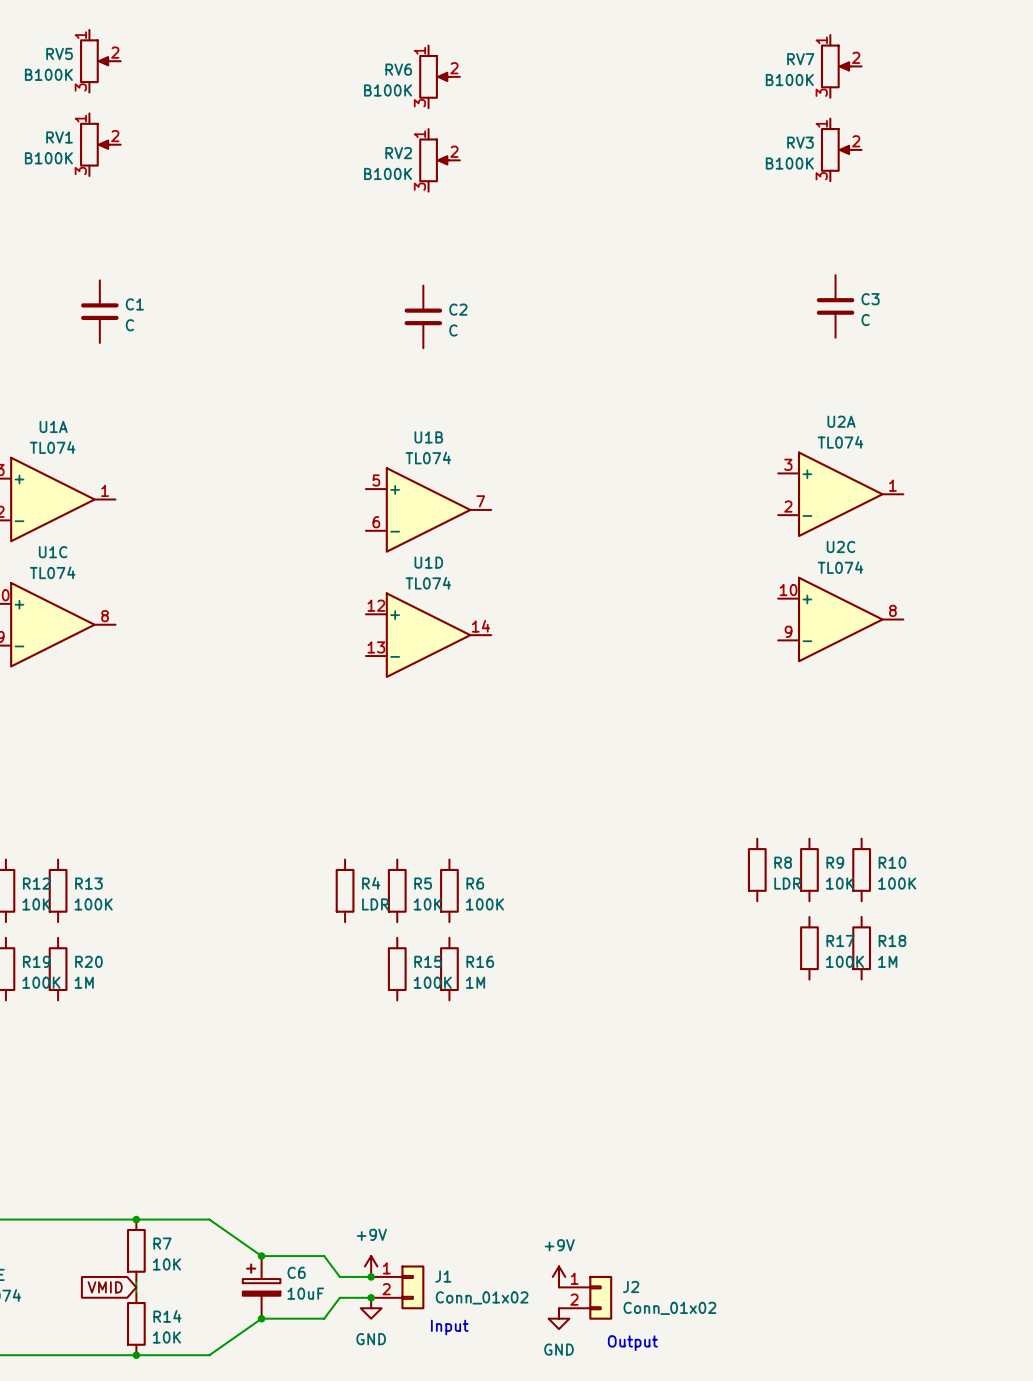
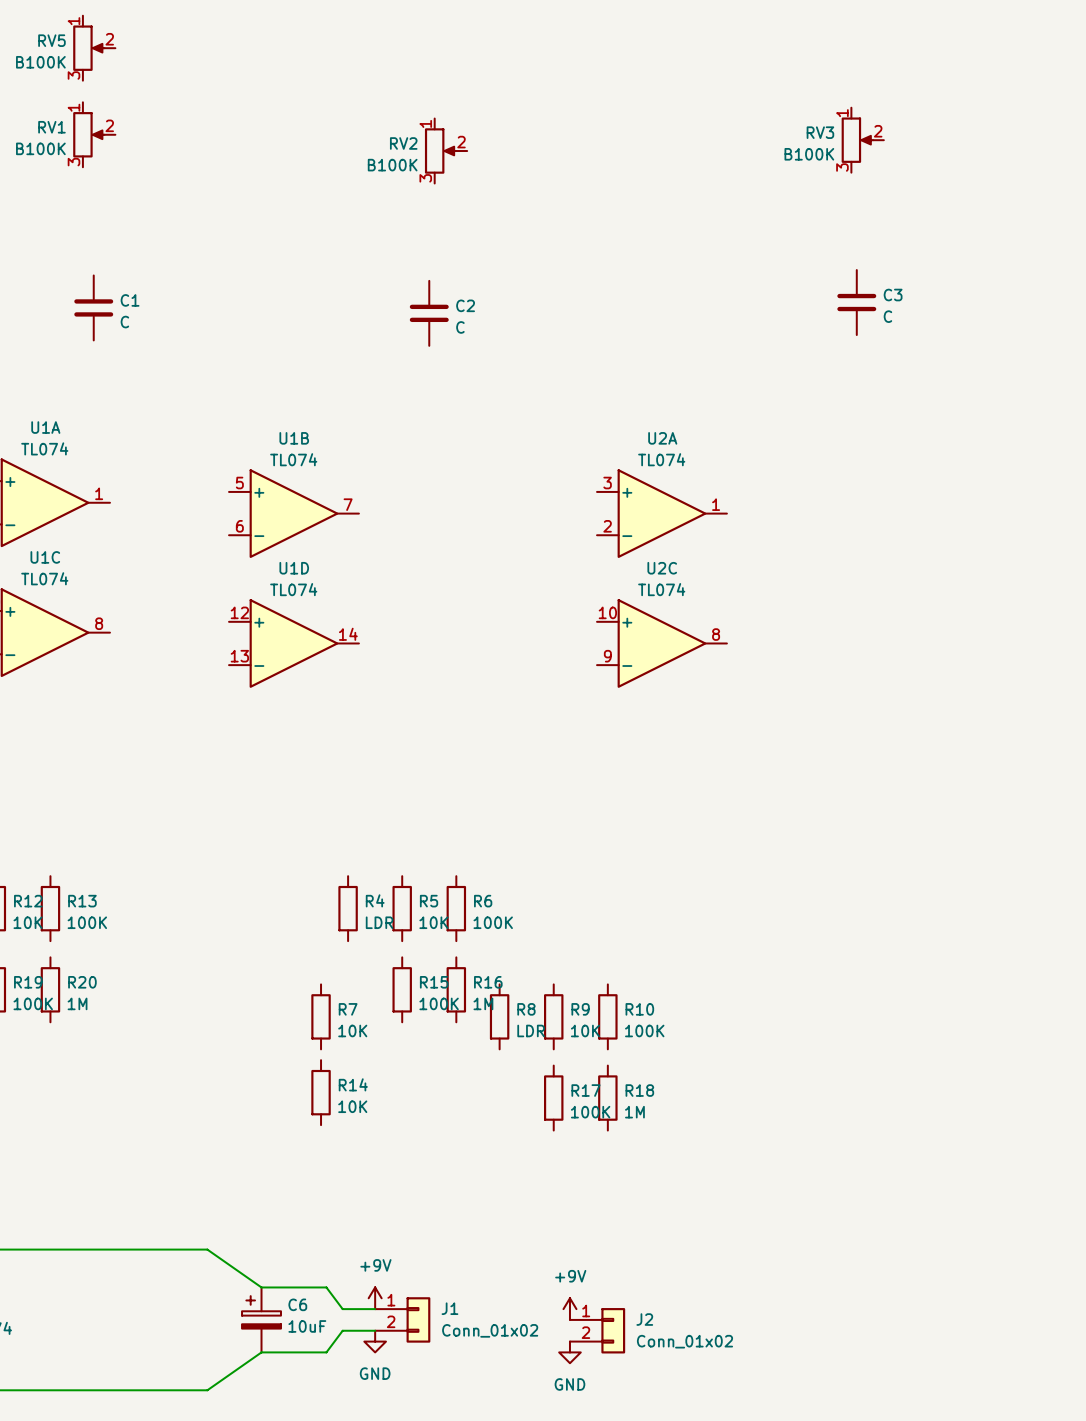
RV7: B100K (841, 66) -> none
RV6: B100K (439, 76) -> none
U2A position: (840, 494) -> (661, 513)
U1B position: (428, 509) -> (293, 513)
U2C position: (840, 619) -> (661, 643)
U1D position: (428, 635) -> (293, 643)
R8 position: (757, 869) -> (499, 1016)
R9 position: (809, 869) -> (553, 1016)
R10 position: (861, 869) -> (607, 1016)
R17 position: (809, 948) -> (553, 1098)
R18 position: (861, 948) -> (607, 1098)
junction: (136, 1219) -> none
R7 position: (136, 1250) -> (321, 1016)
junction: (261, 1256) -> none
junction: (371, 1276) -> none
wire: (136, 1282) (136, 1292) -> none
global label: VMID (105, 1287) -> none
junction: (371, 1297) -> none
junction: (261, 1318) -> none
R14 position: (136, 1323) -> (321, 1092)
text: Input (449, 1327) -> none
text: Output (632, 1343) -> none
junction: (136, 1355) -> none

